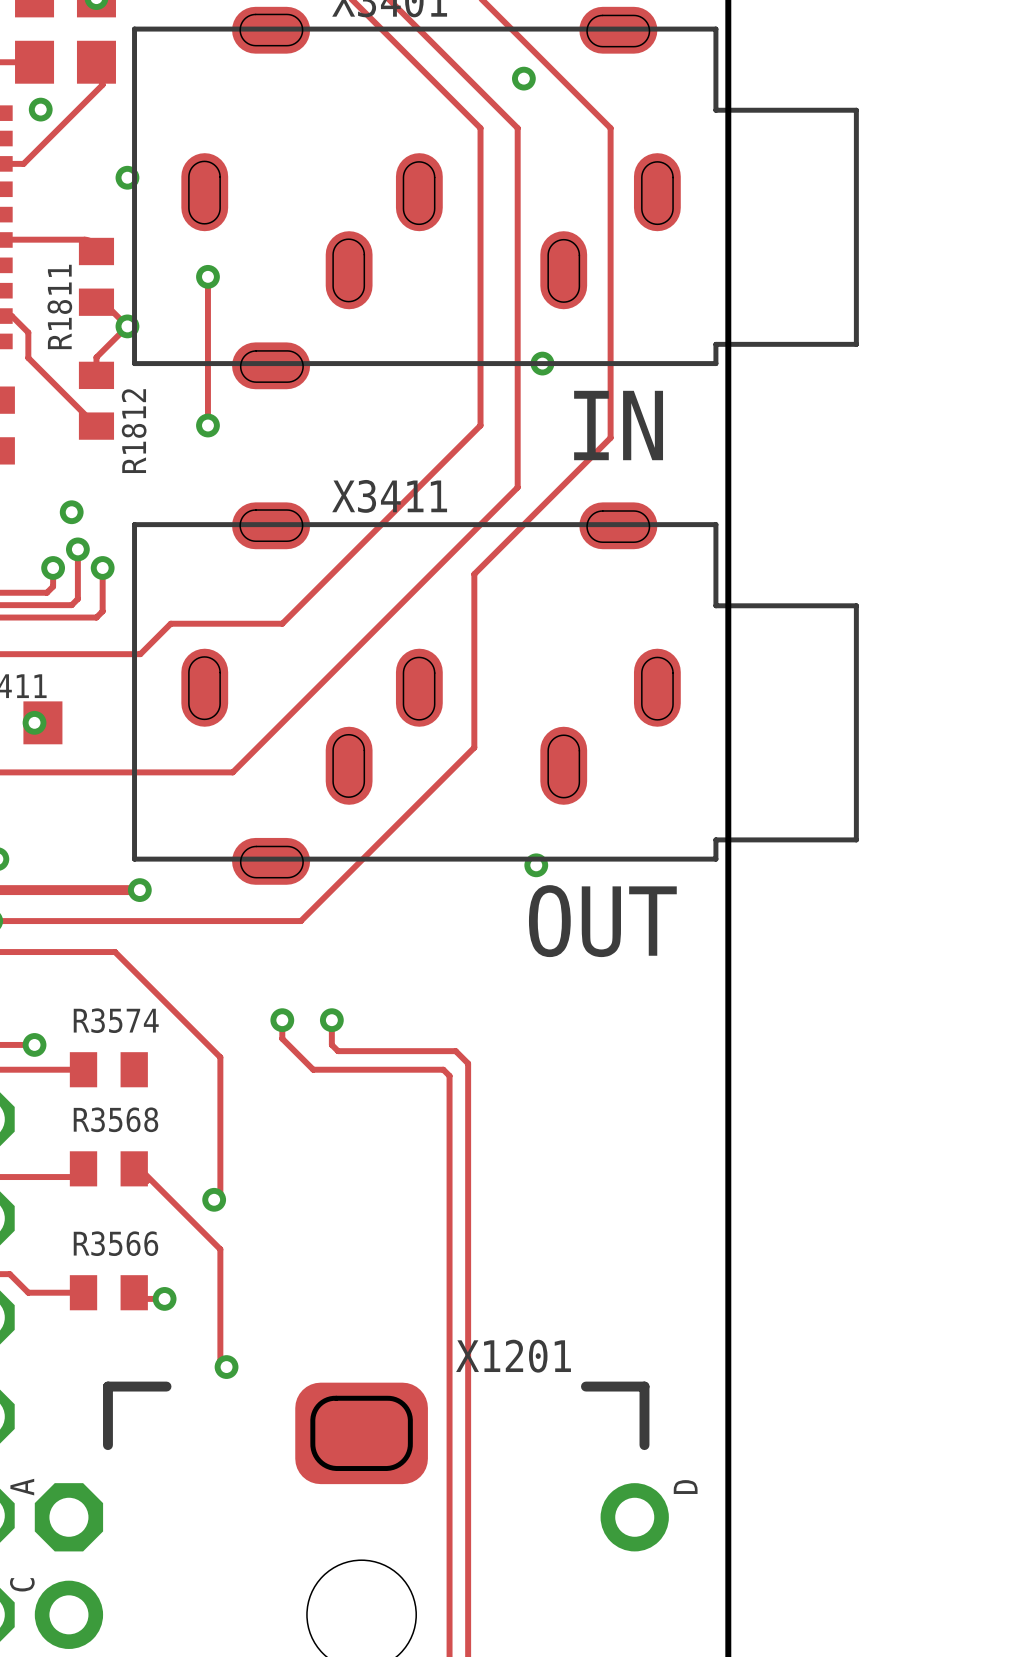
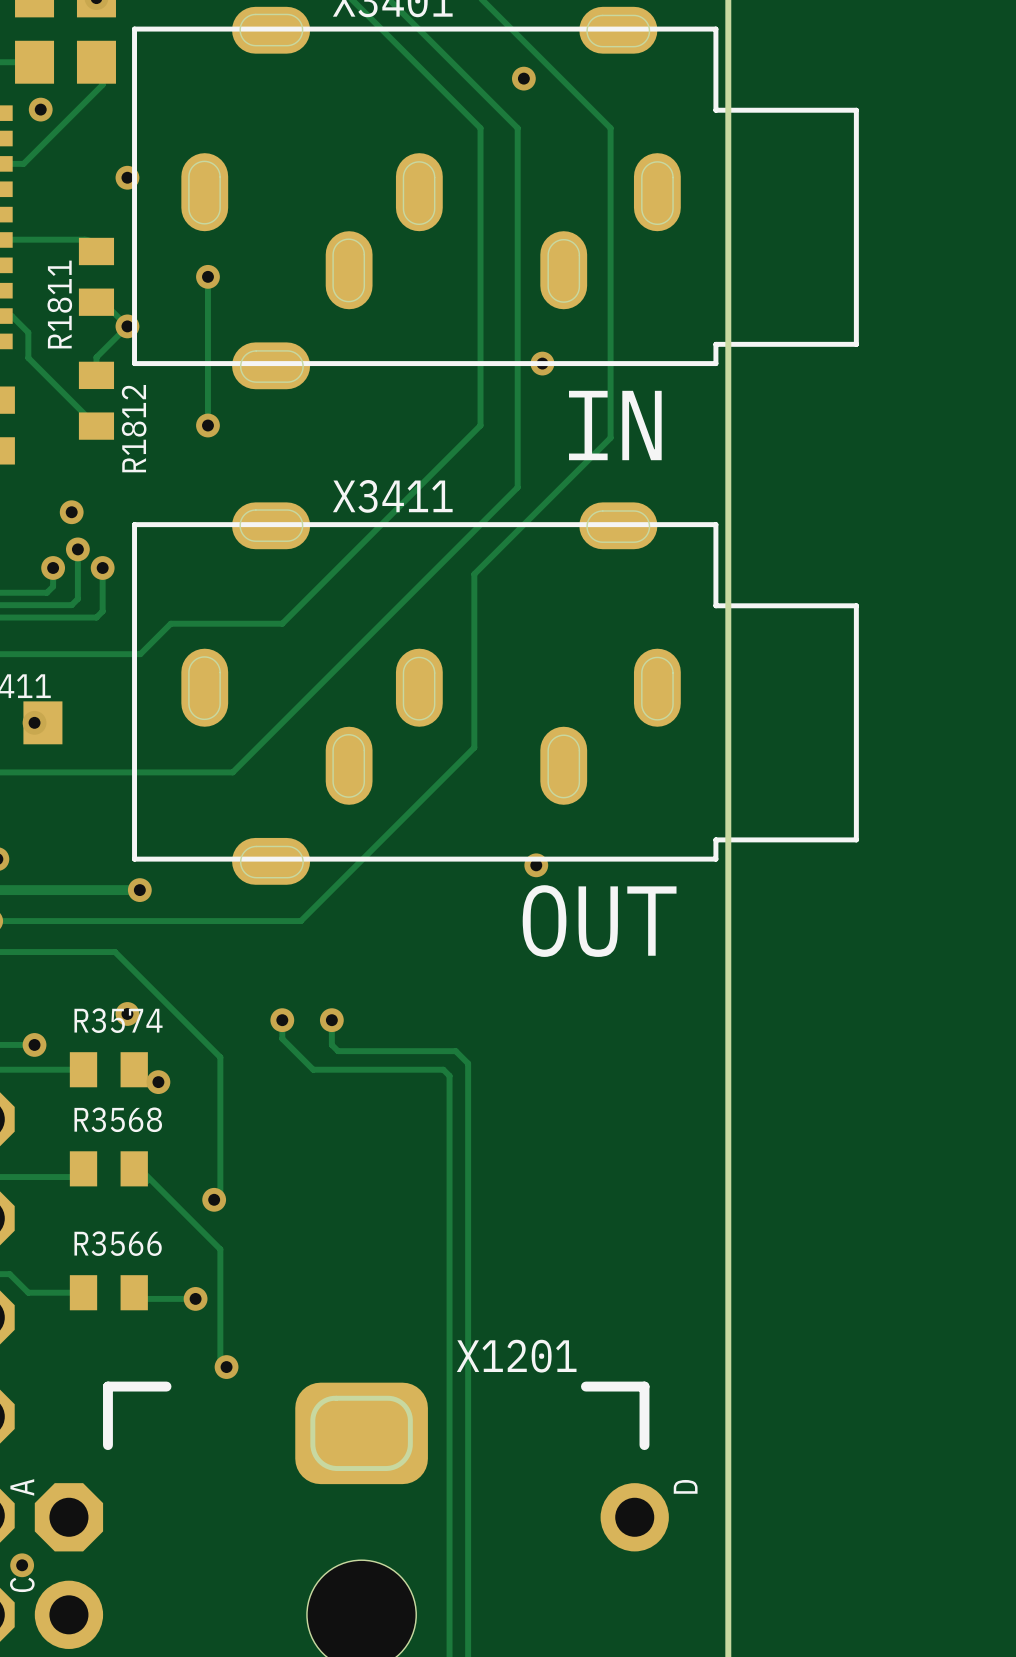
via: none -> (127, 1013)
via: none -> (158, 1082)
track: none -> (164, 1298) (195, 1298)
via position: (164, 1298) -> (195, 1298)
via: none -> (22, 1565)

